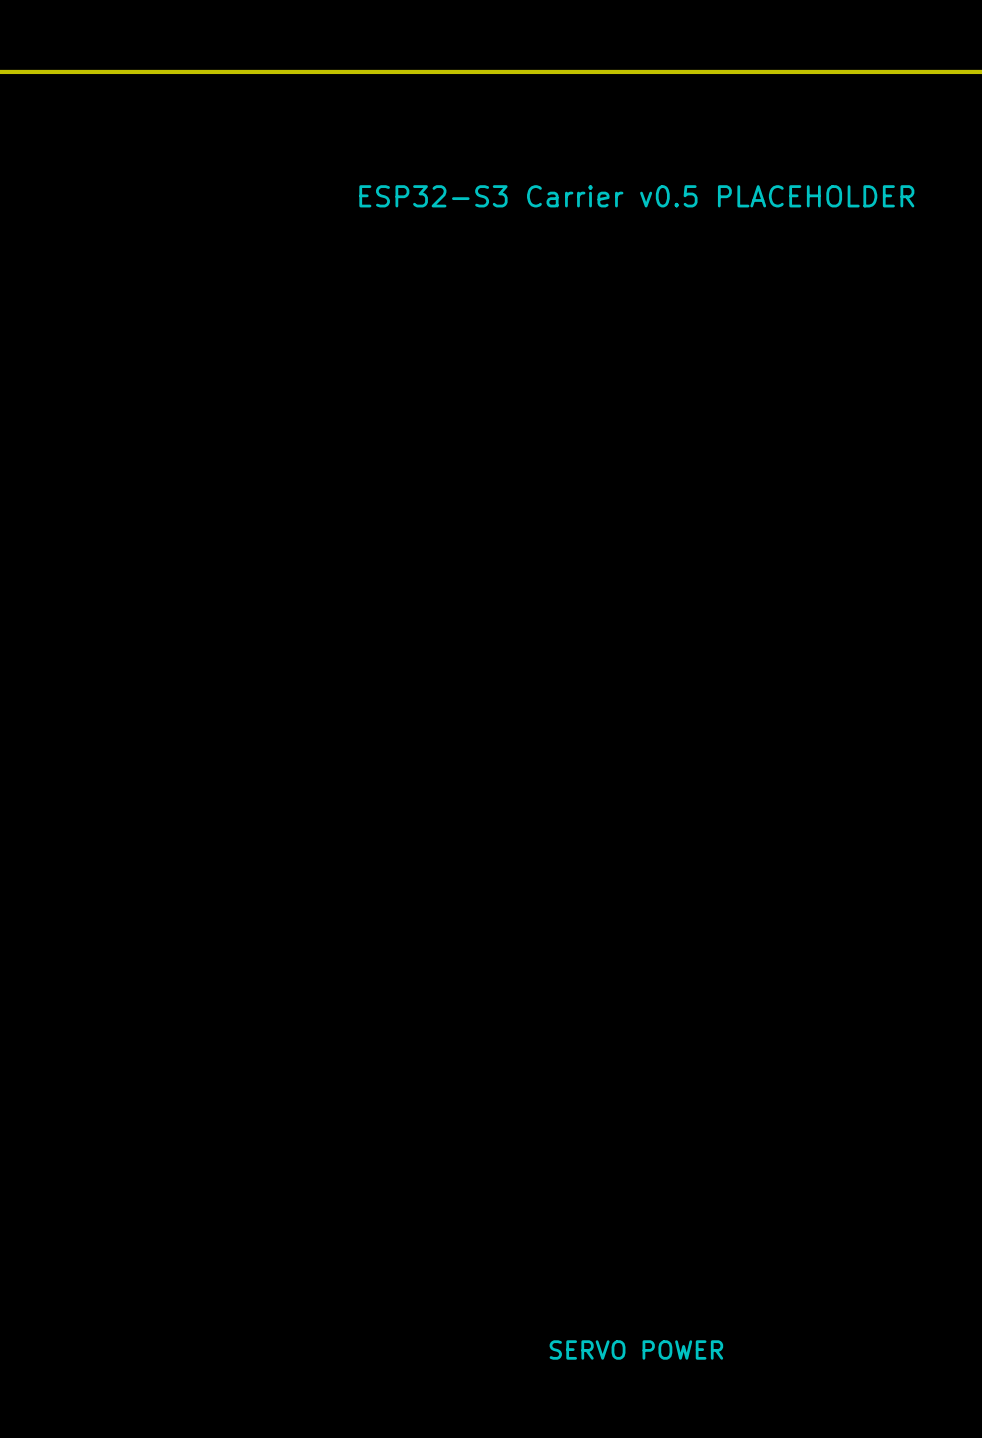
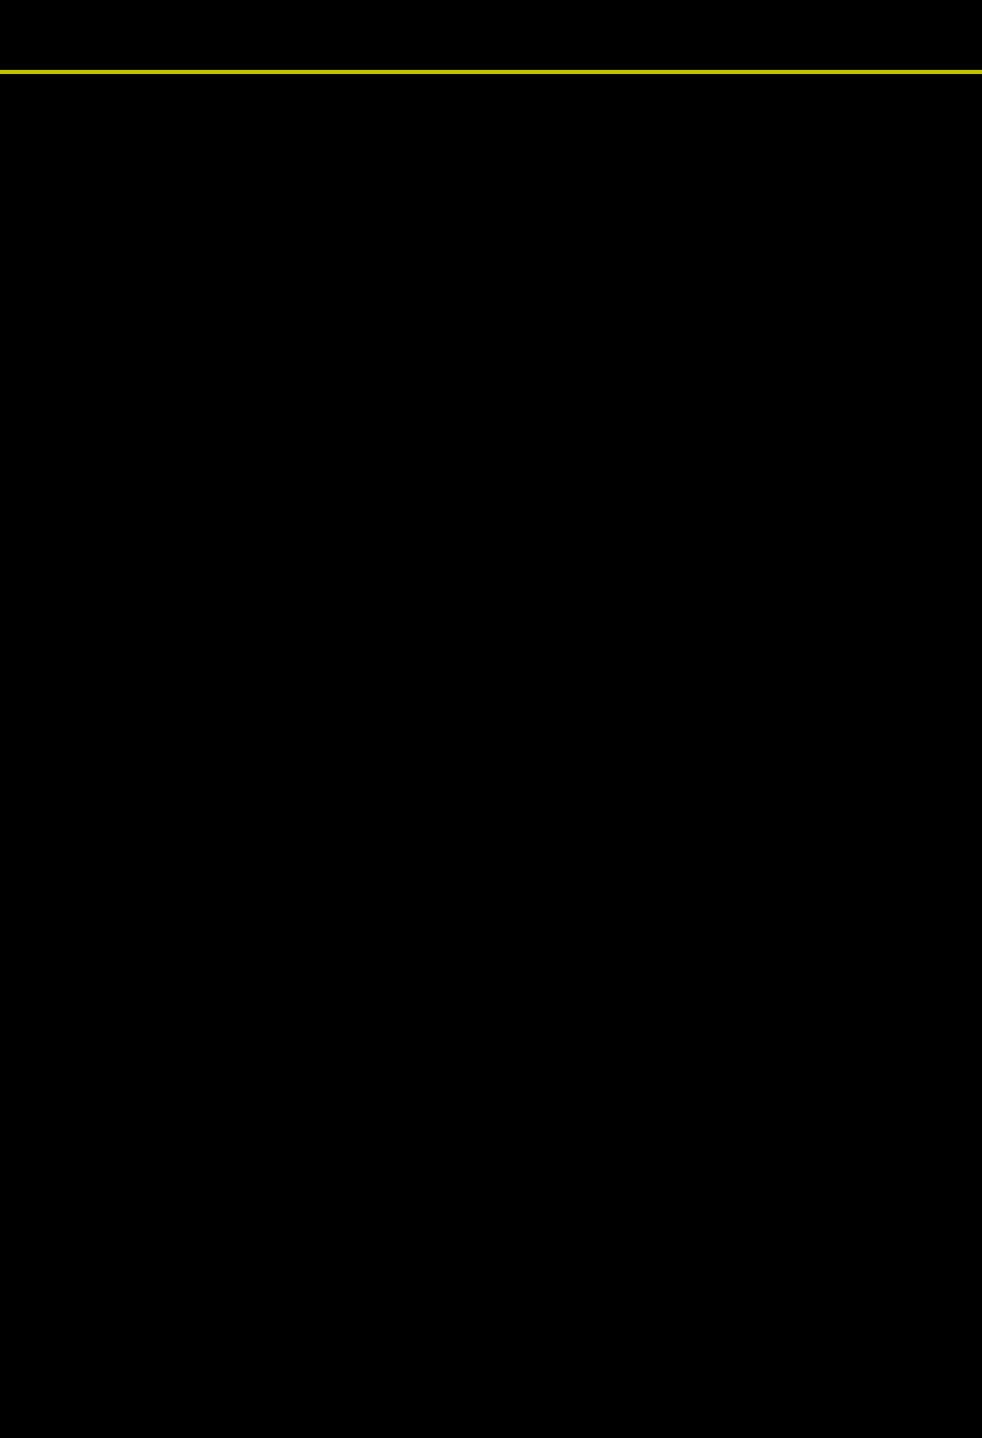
text: ESP32-S3 Carrier v0.5 PLACEHOLDER (636, 196) -> none
text: SERVO POWER (636, 1349) -> none

